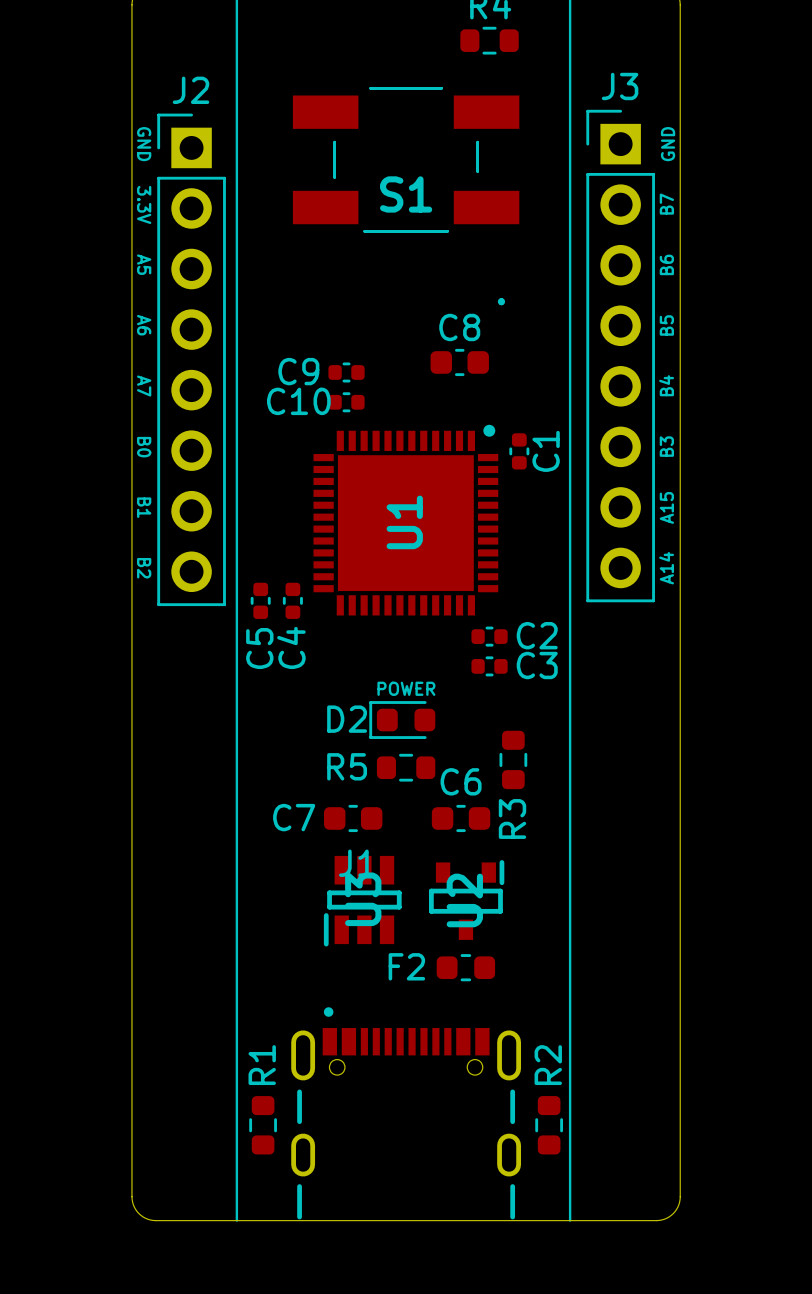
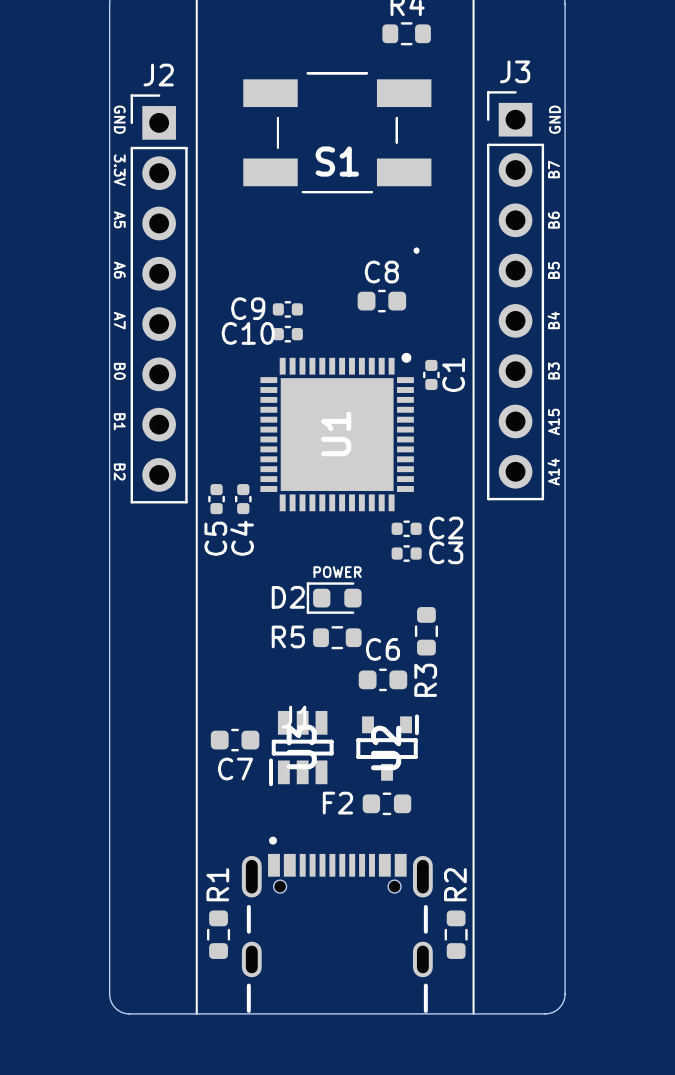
C7 name position: C7 (294, 817) -> C7 (235, 769)
C7 position: (353, 818) -> (235, 740)

